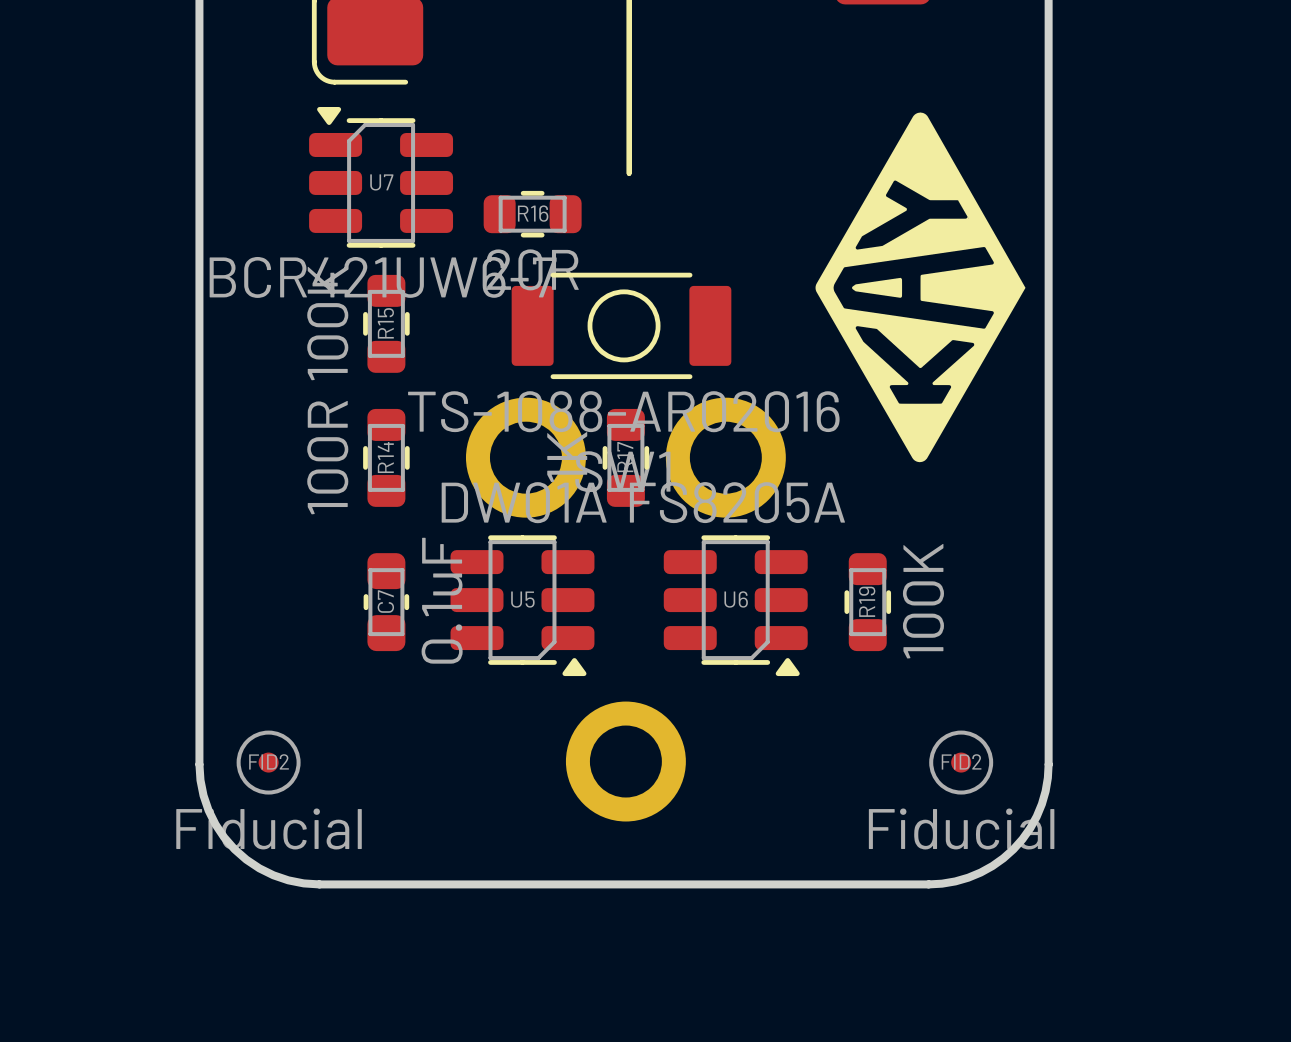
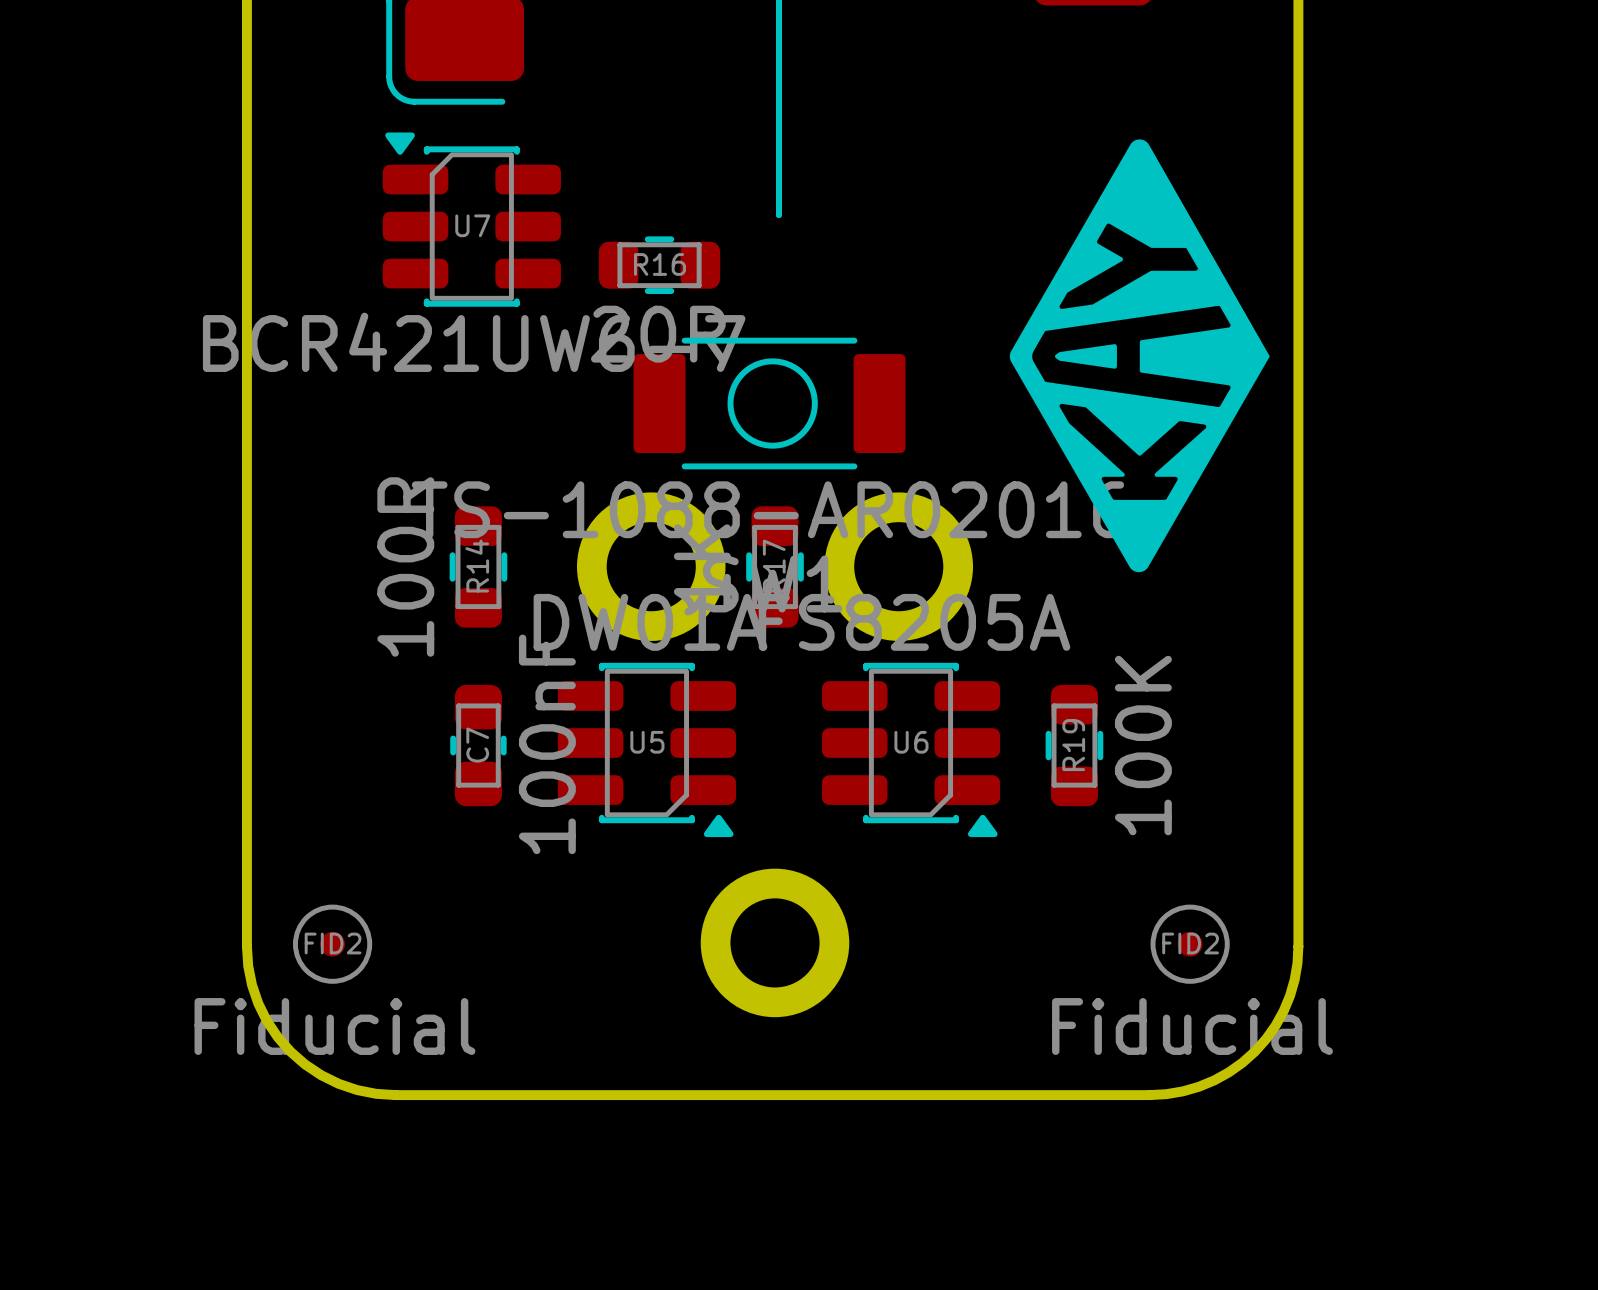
U7 footprint: [309, 107, 454, 248] -> [382, 132, 561, 307]
R15: 100K (386, 323) -> none
U5 footprint: [450, 535, 595, 677] -> [557, 662, 737, 838]
U6 footprint: [663, 535, 808, 677] -> [821, 662, 1001, 838]
C7 value: 0.1uF (442, 600) -> 100nF (547, 744)

